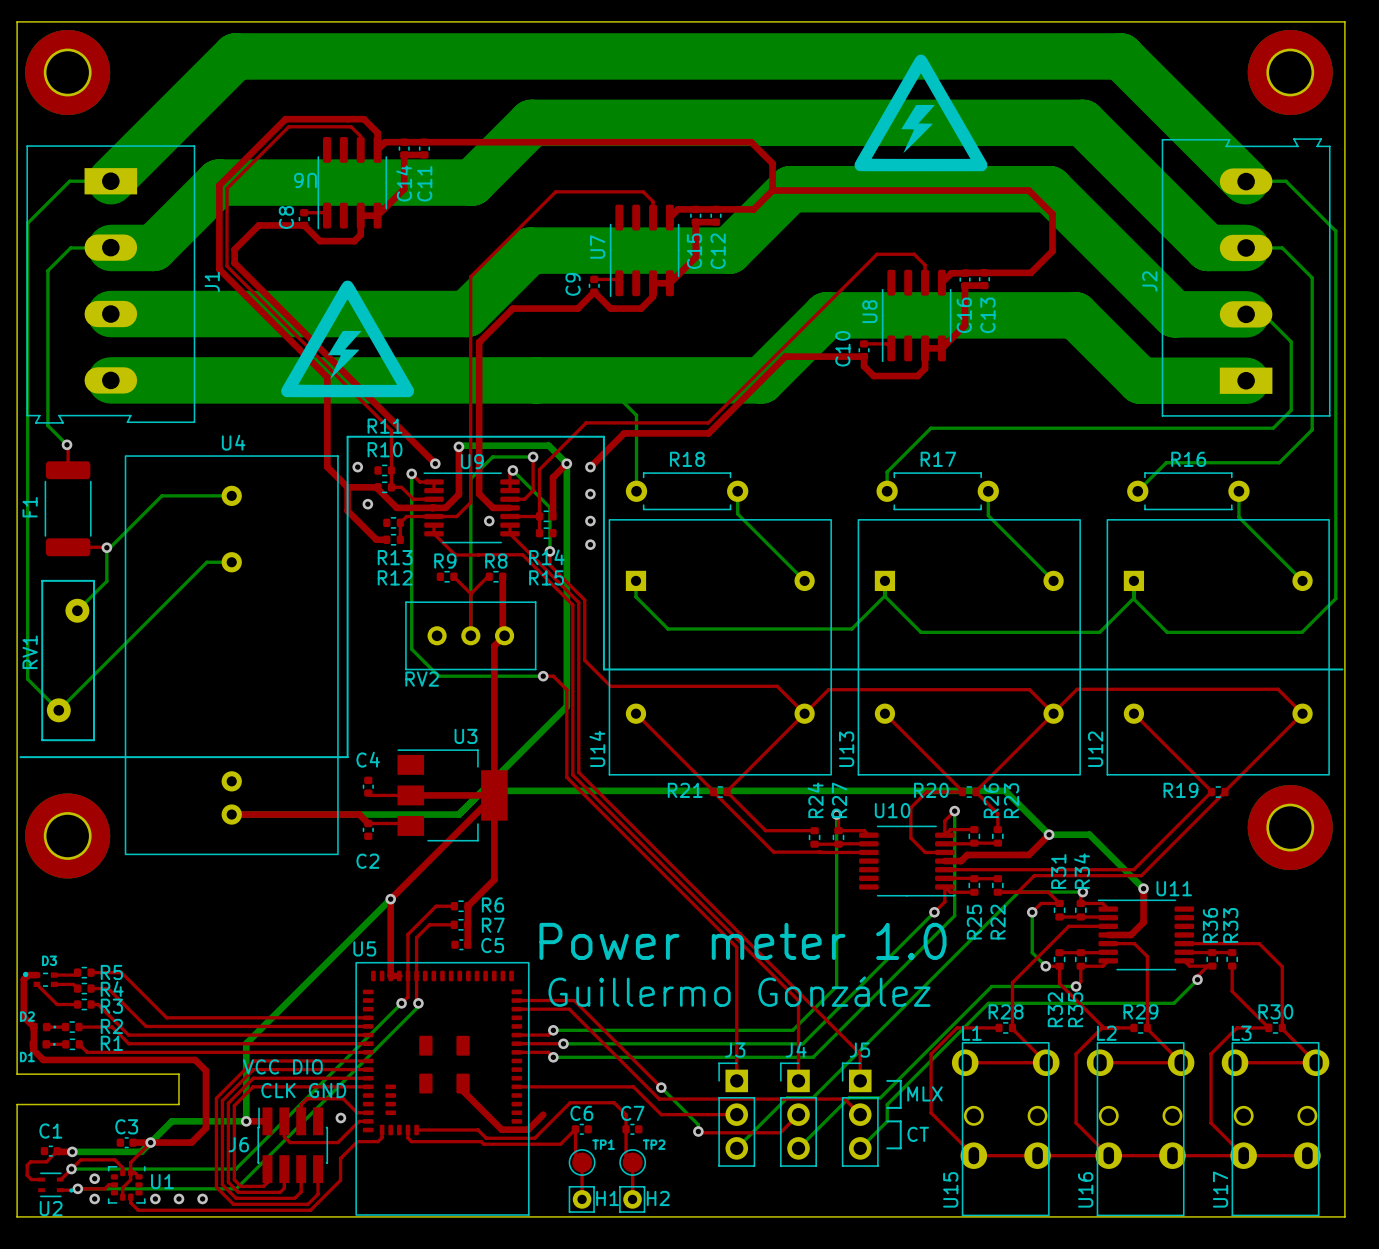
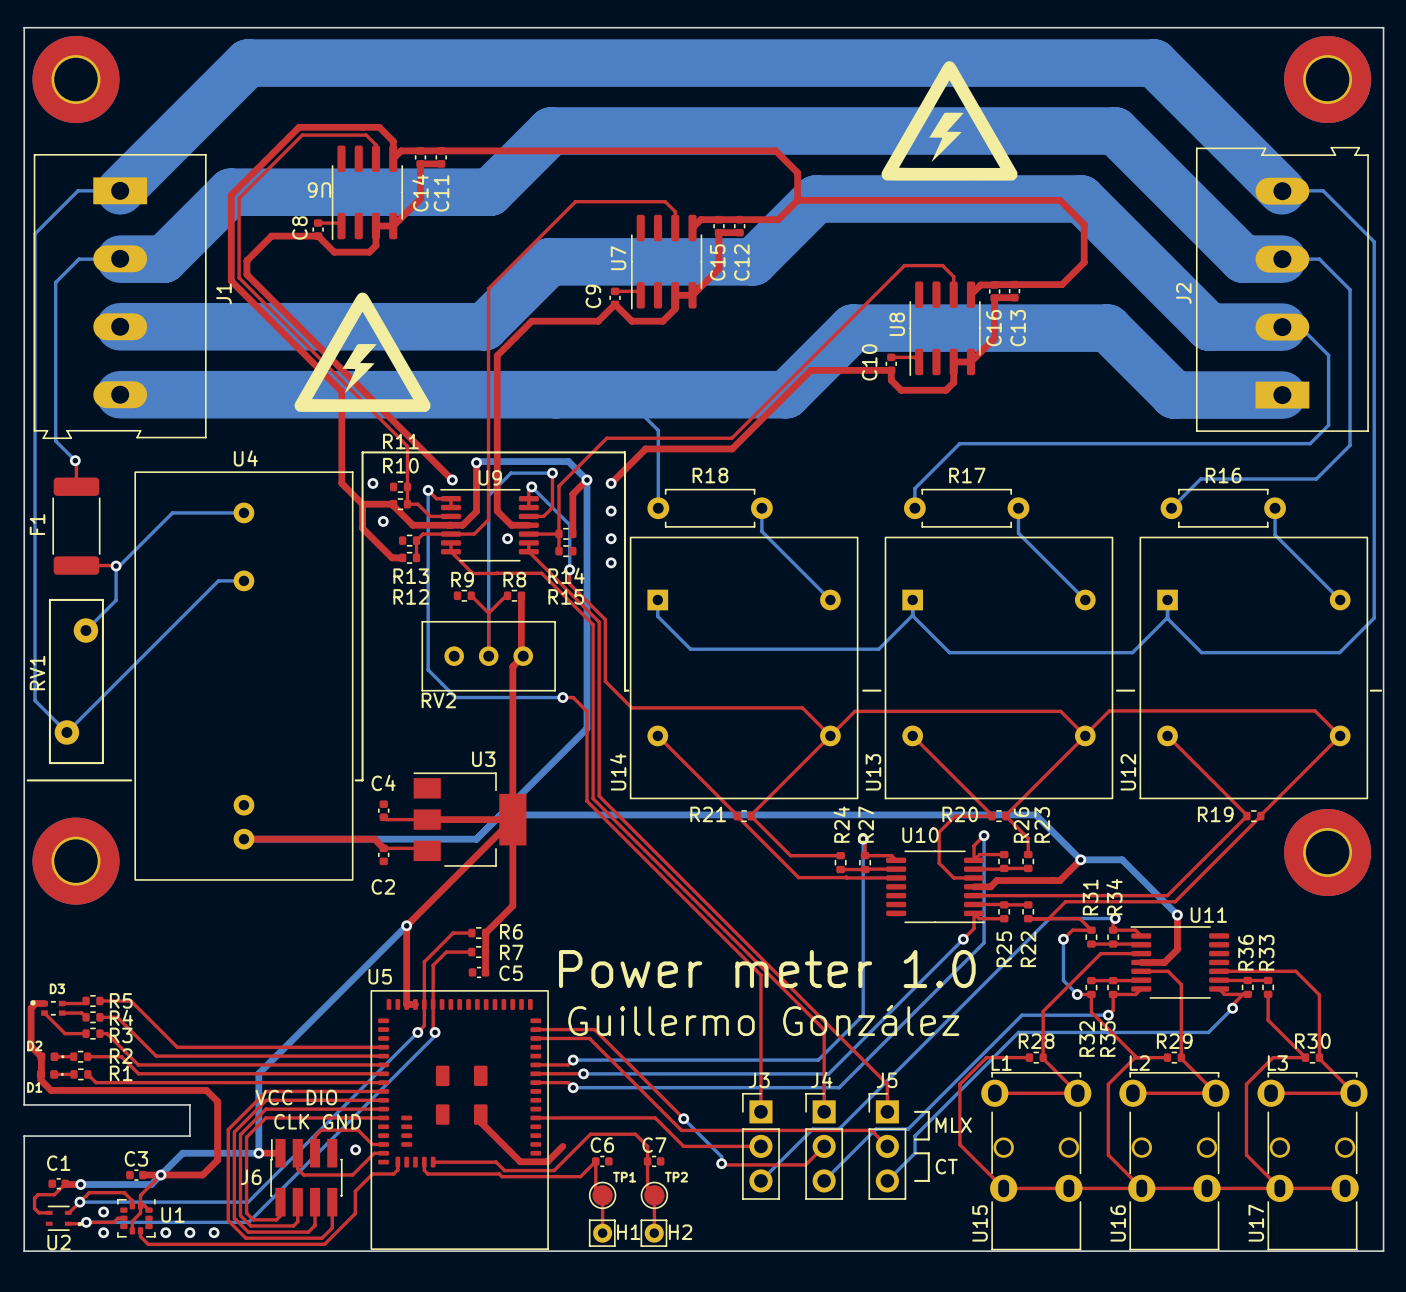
line: (607, 669) (836, 669) -> none
line: (853, 669) (1084, 669) -> none
line: (1101, 669) (1332, 669) -> none
line: (121, 757) (340, 757) -> none
U15 footprint: [951, 1042, 1060, 1217] -> [981, 1072, 1092, 1251]
U16 footprint: [1086, 1042, 1195, 1217] -> [1119, 1072, 1230, 1251]
U17 footprint: [1221, 1042, 1330, 1217] -> [1257, 1072, 1368, 1251]

